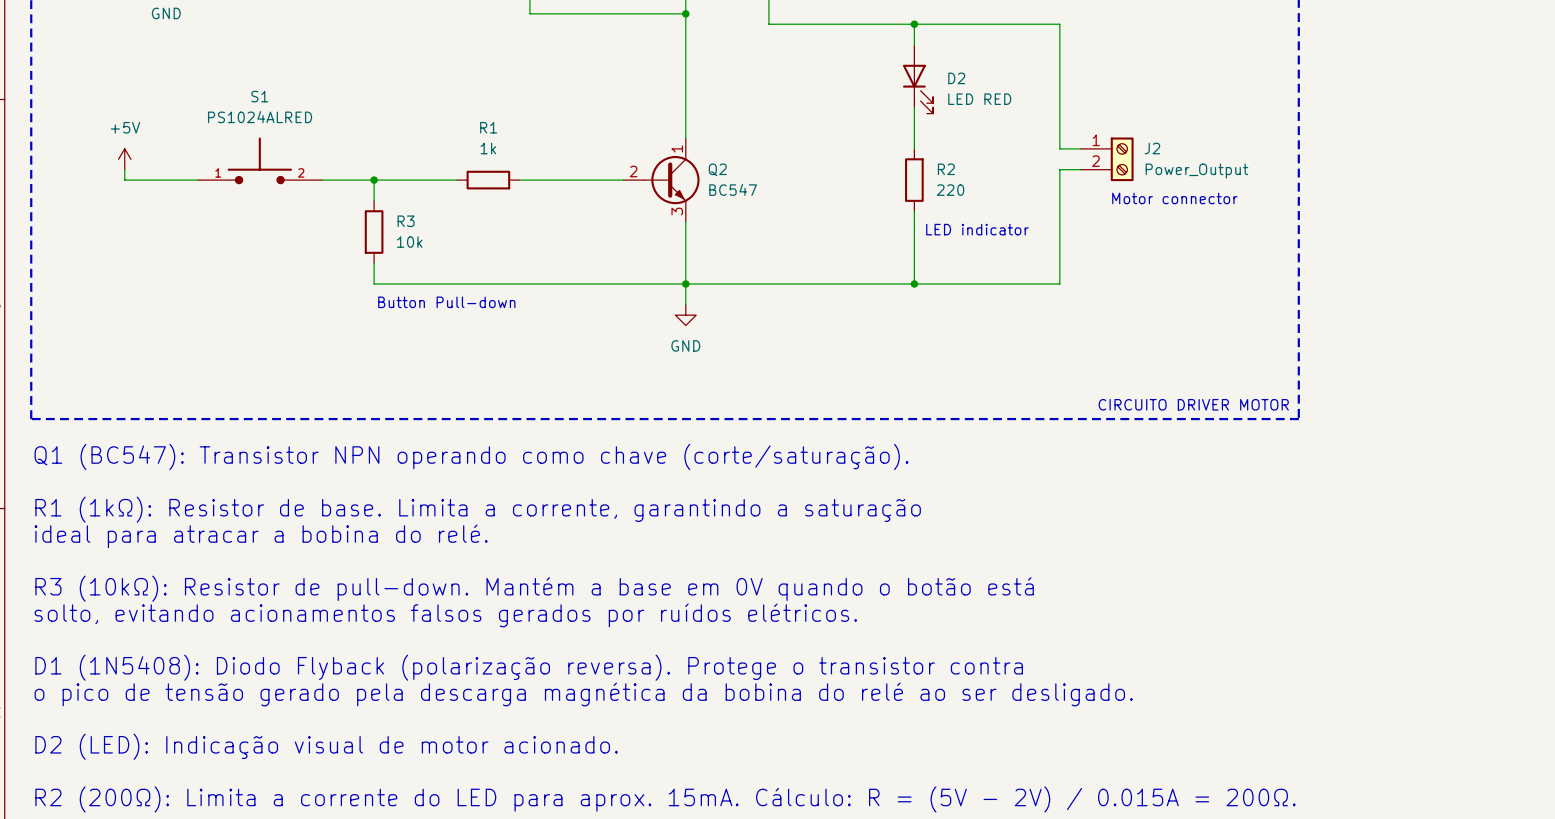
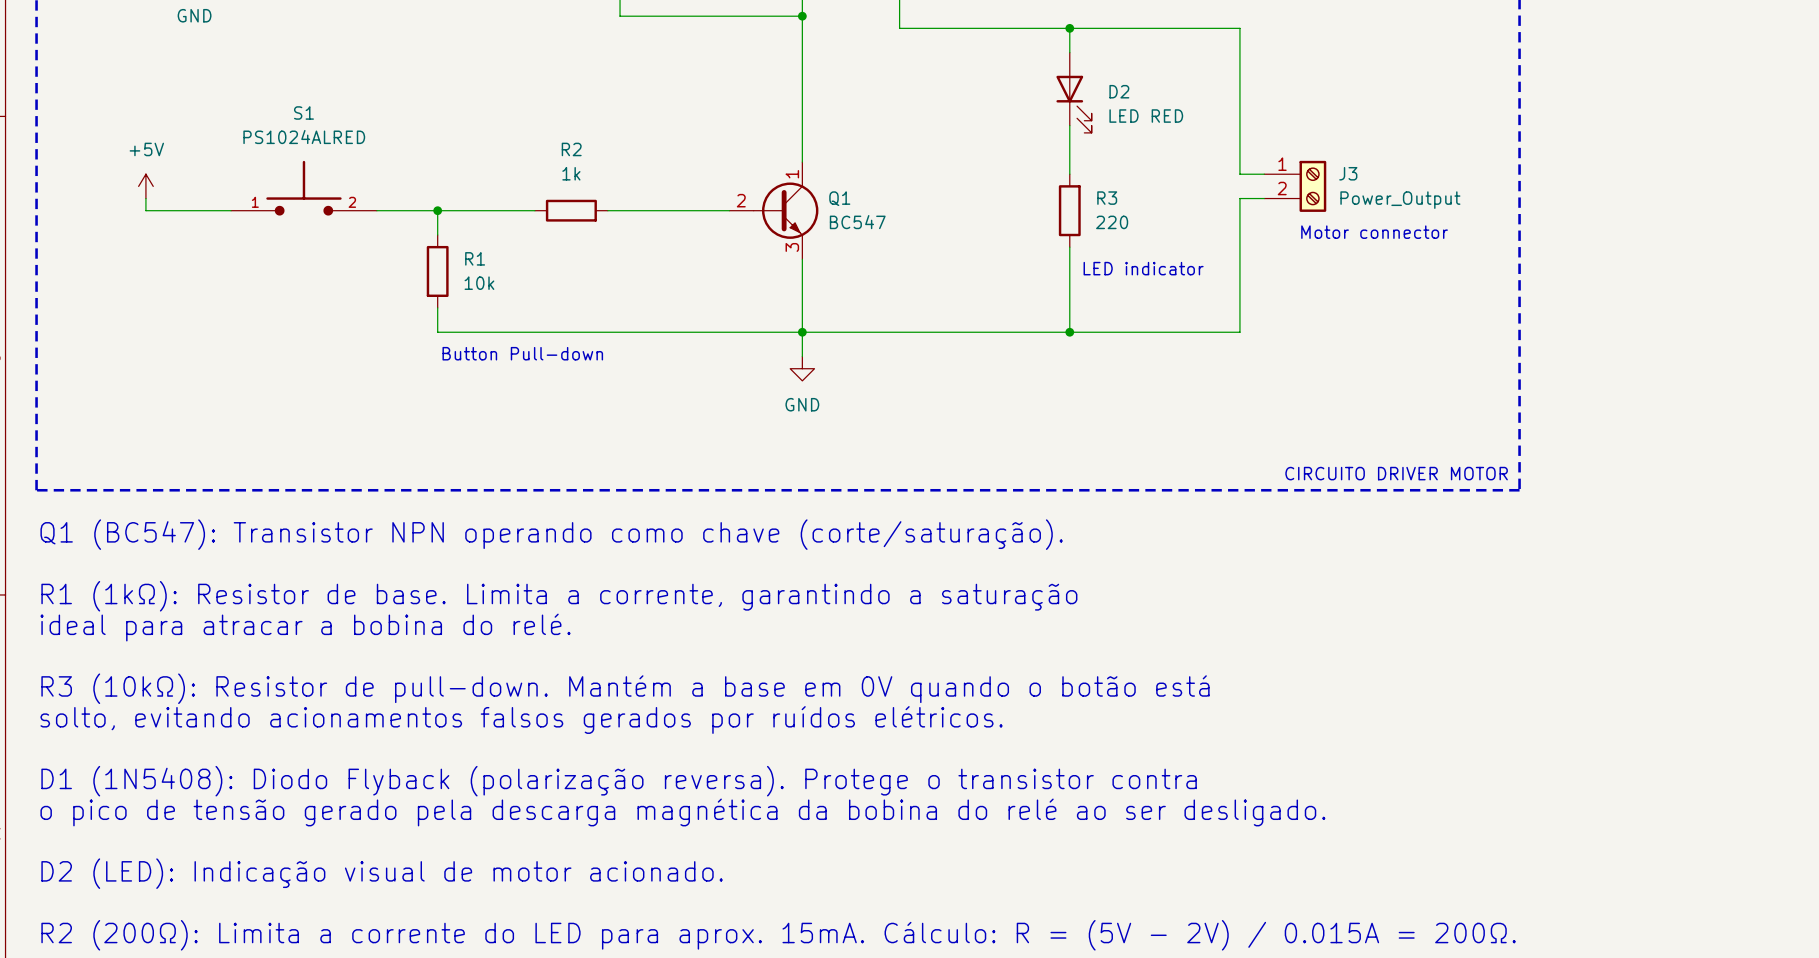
R1 name: R1 (488, 127) -> R2 (571, 149)
J2 name: J2 (1152, 148) -> J3 (1348, 173)
Q2 name: Q2 (717, 169) -> Q1 (839, 198)
R2 name: R2 (946, 169) -> R3 (1107, 198)
R3 name: R3 (406, 221) -> R1 (475, 258)

